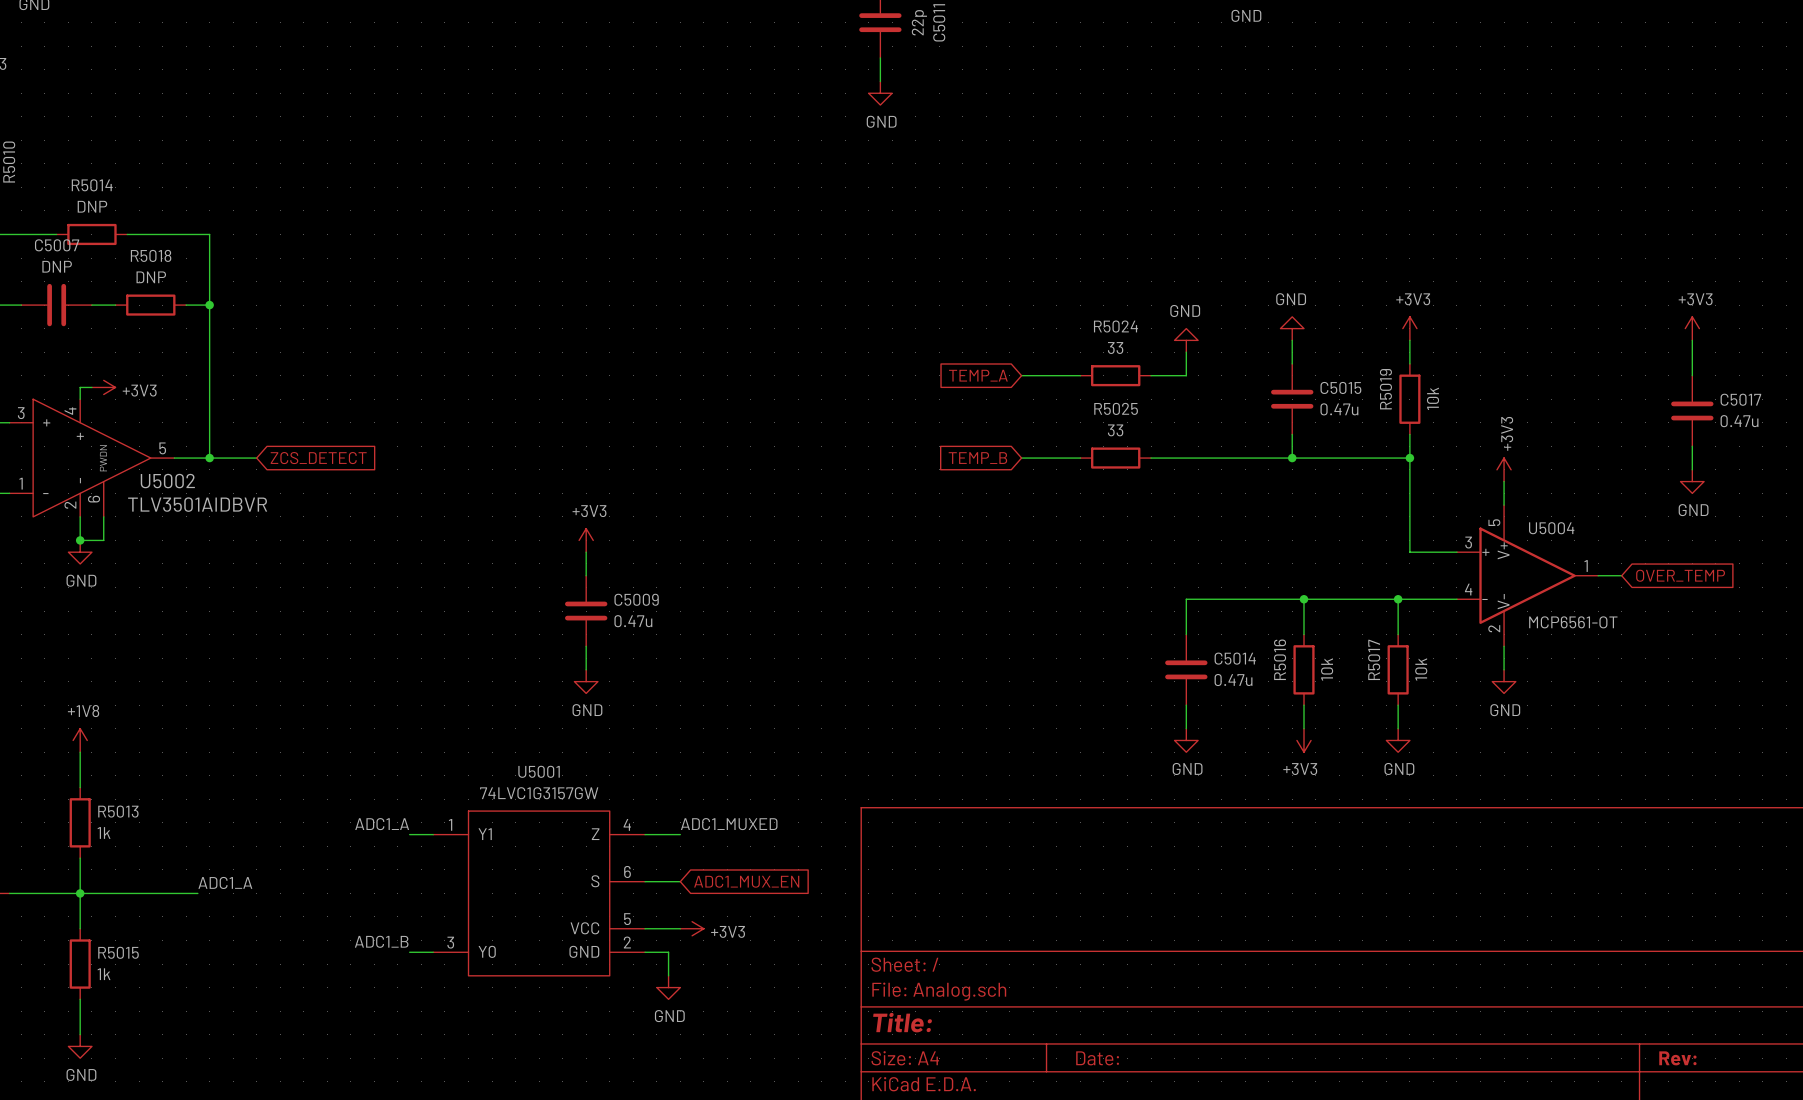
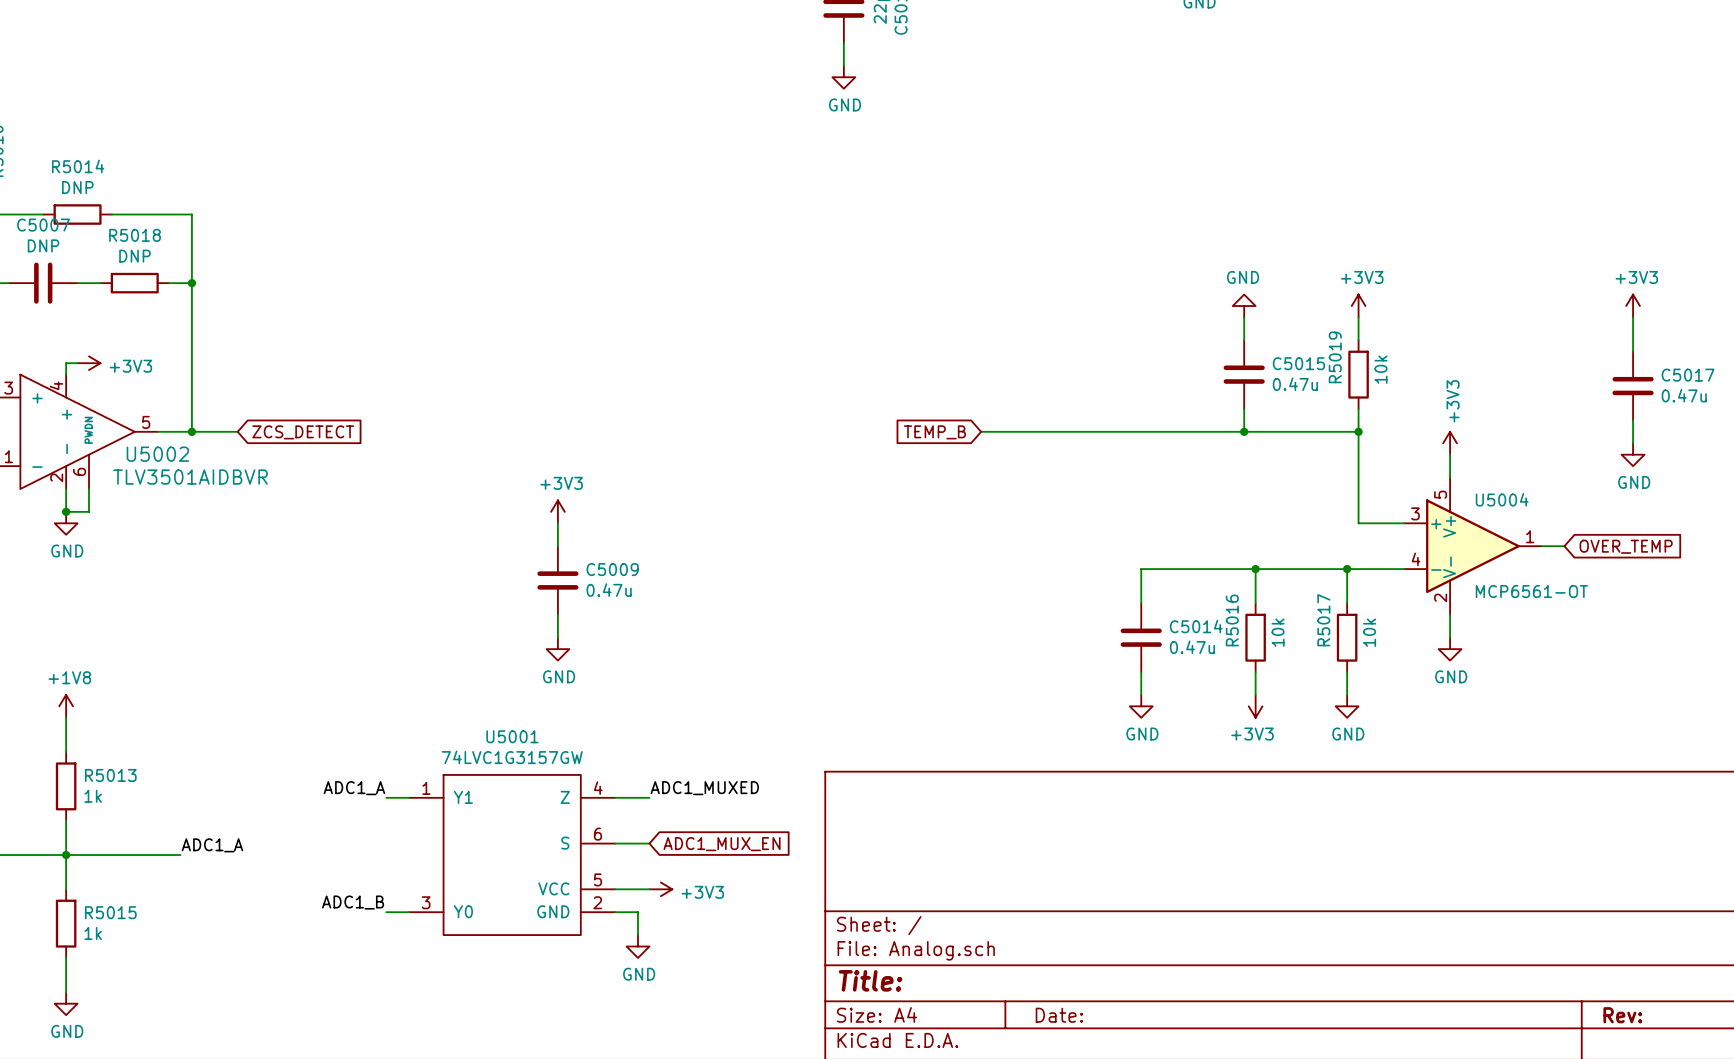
power symbol: GND (1186, 340) -> none
wire: (1186, 352) (1186, 375) (1151, 375) -> none
global label: TEMP_A (978, 375) -> none
wire: (1021, 375) (1080, 375) -> none
R5024: 33 (1115, 375) -> none
wire: none -> (1038, 431) (1106, 431)
R5025: 33 (1115, 458) -> none

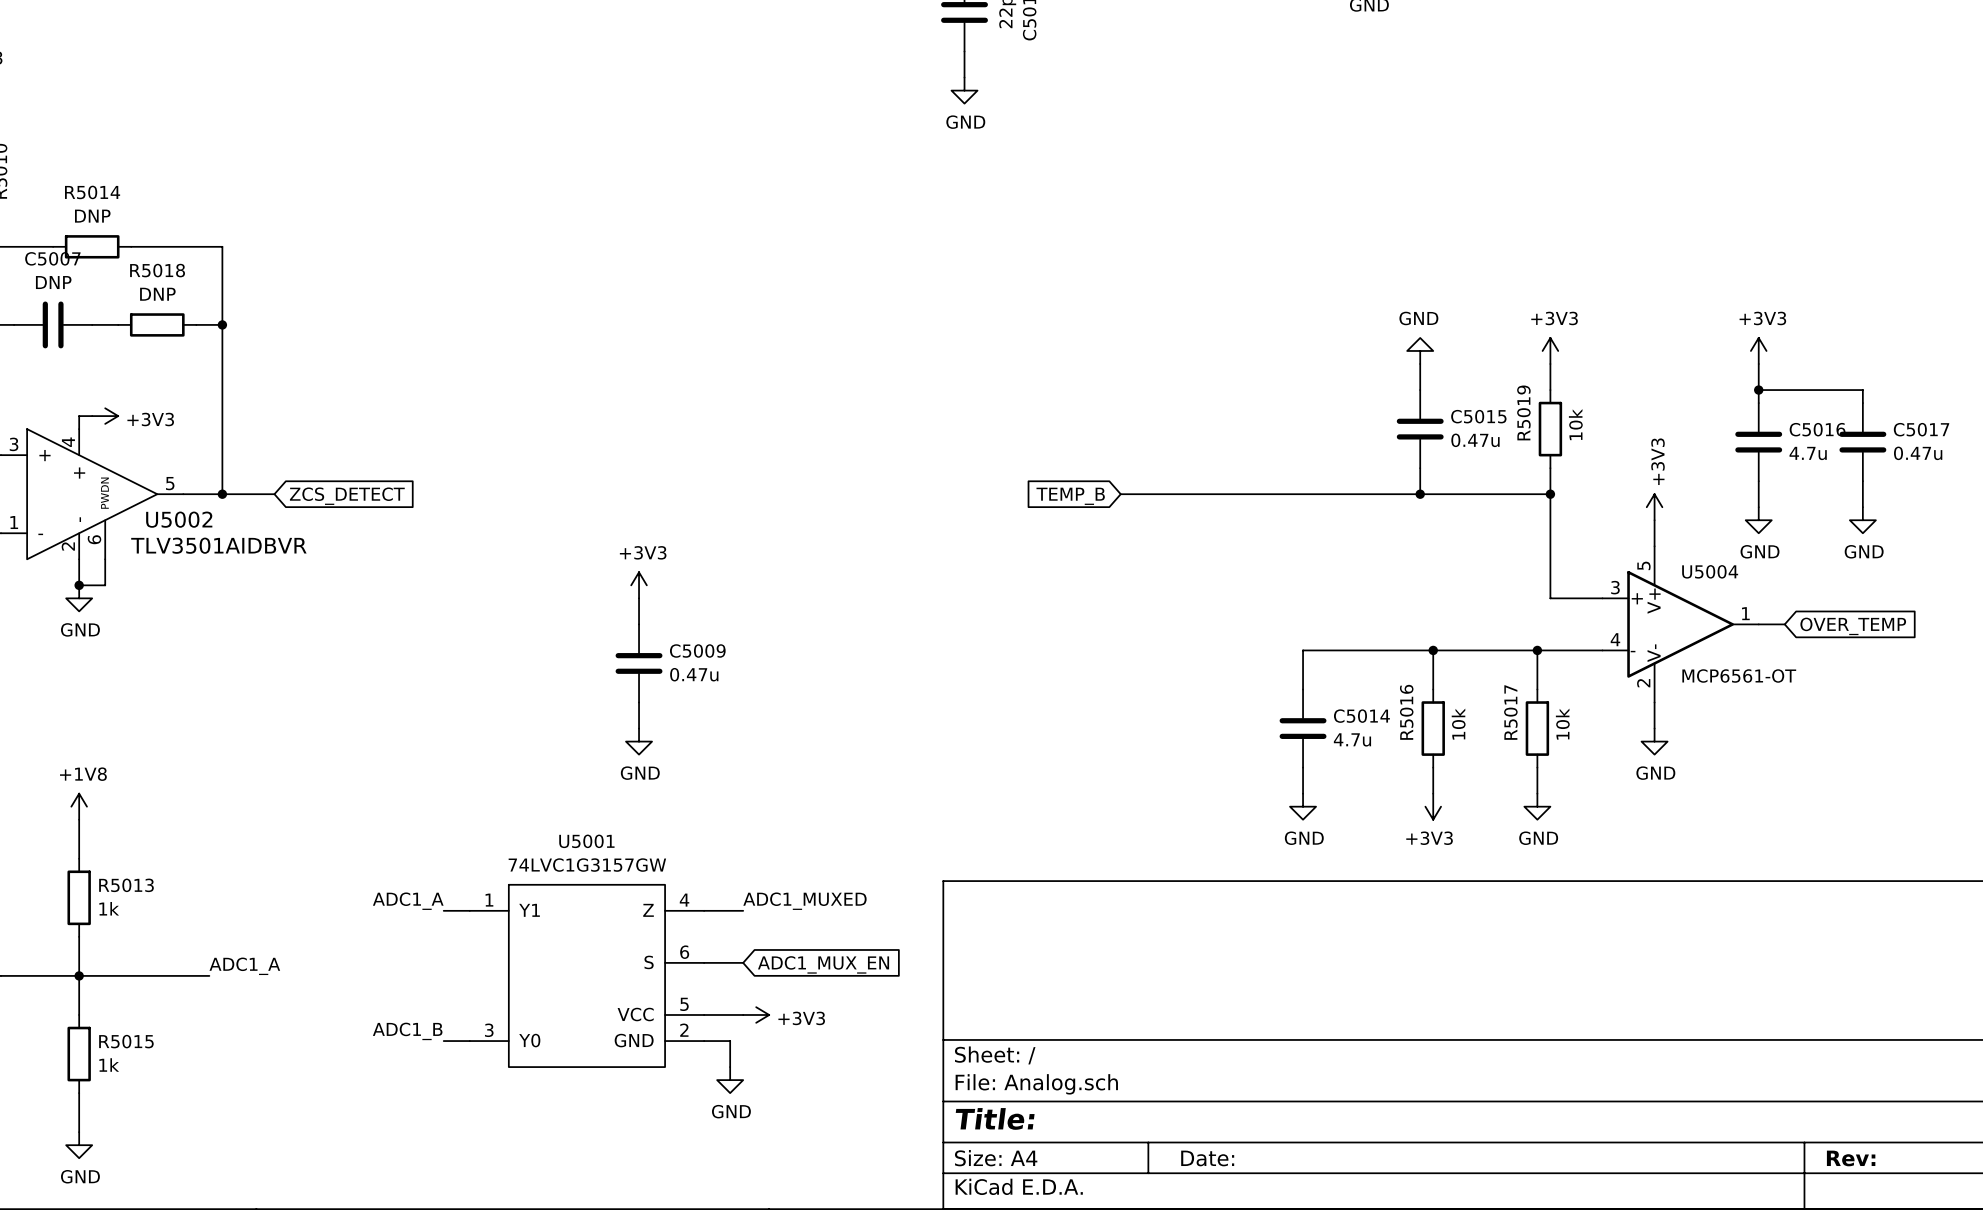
power symbol position: +3V3 (1633, 306) -> +3V3 (1758, 350)
wire: none -> (1758, 364) (1758, 403)
wire: (1633, 317) (1633, 340) -> (1758, 390) (1862, 390)
junction: none -> (1758, 390)
C5016: none -> 4.7u (1758, 442)
wire: none -> (1758, 481) (1758, 507)
power symbol: none -> GND (1758, 520)
C5014 value: 0.47u (1192, 647) -> 4.7u (1352, 739)

